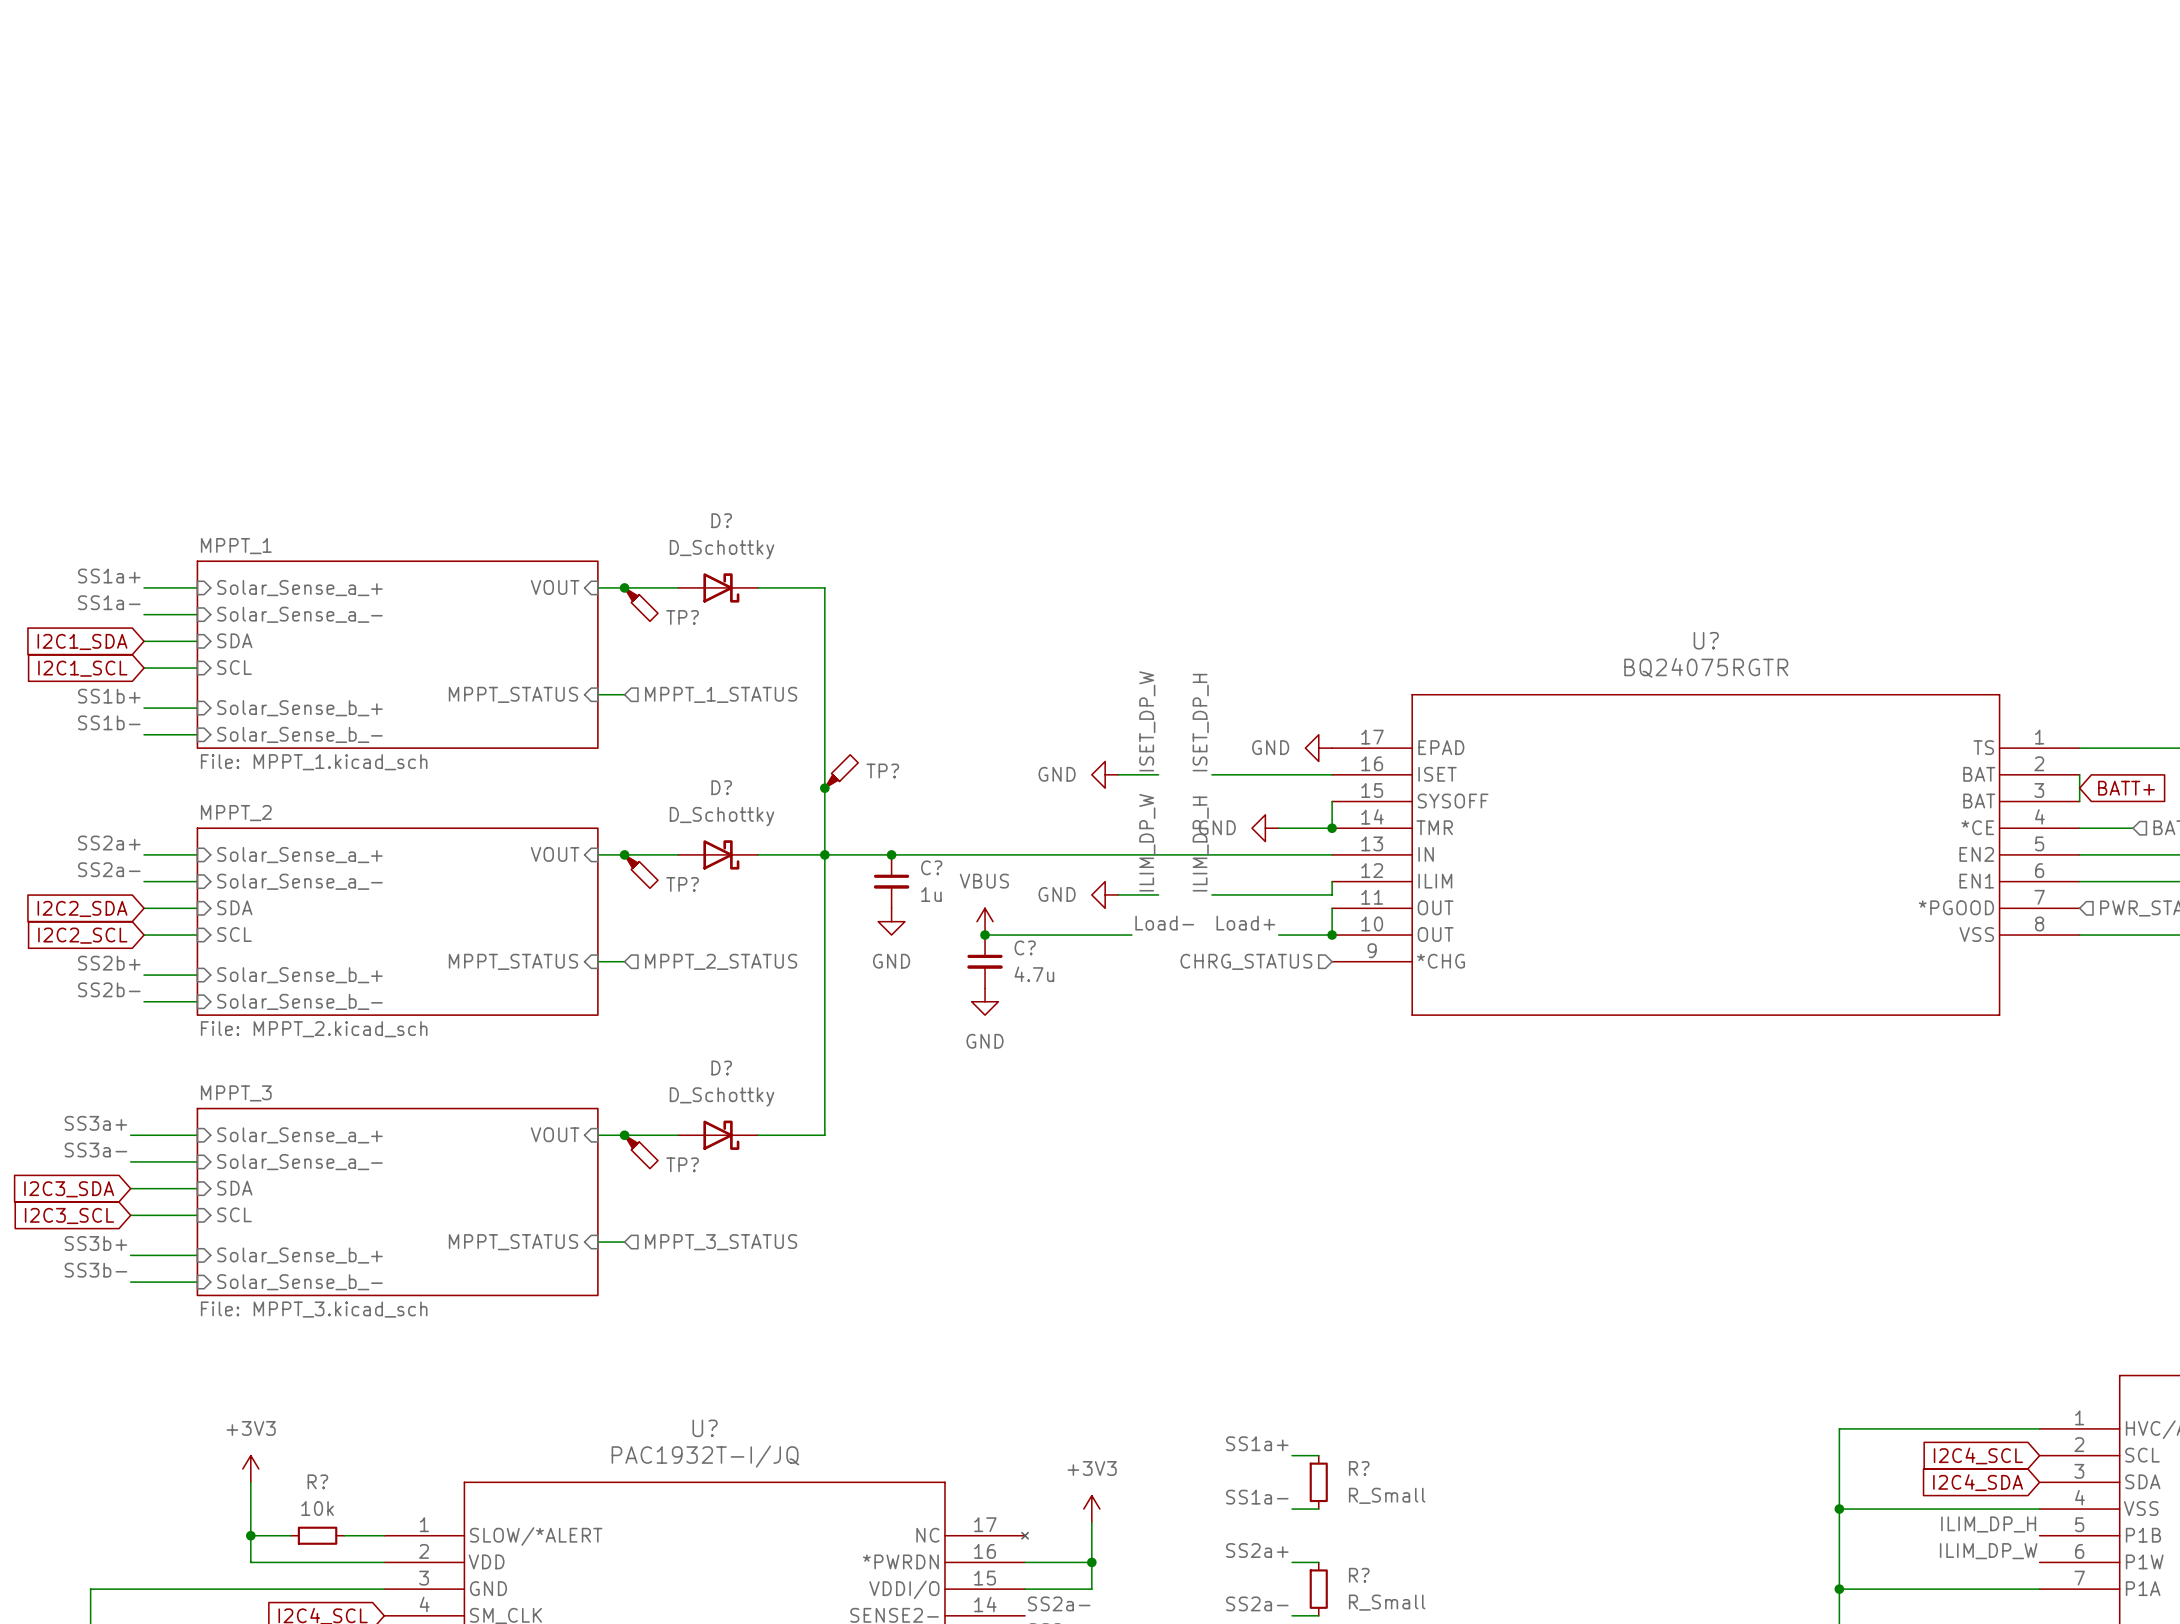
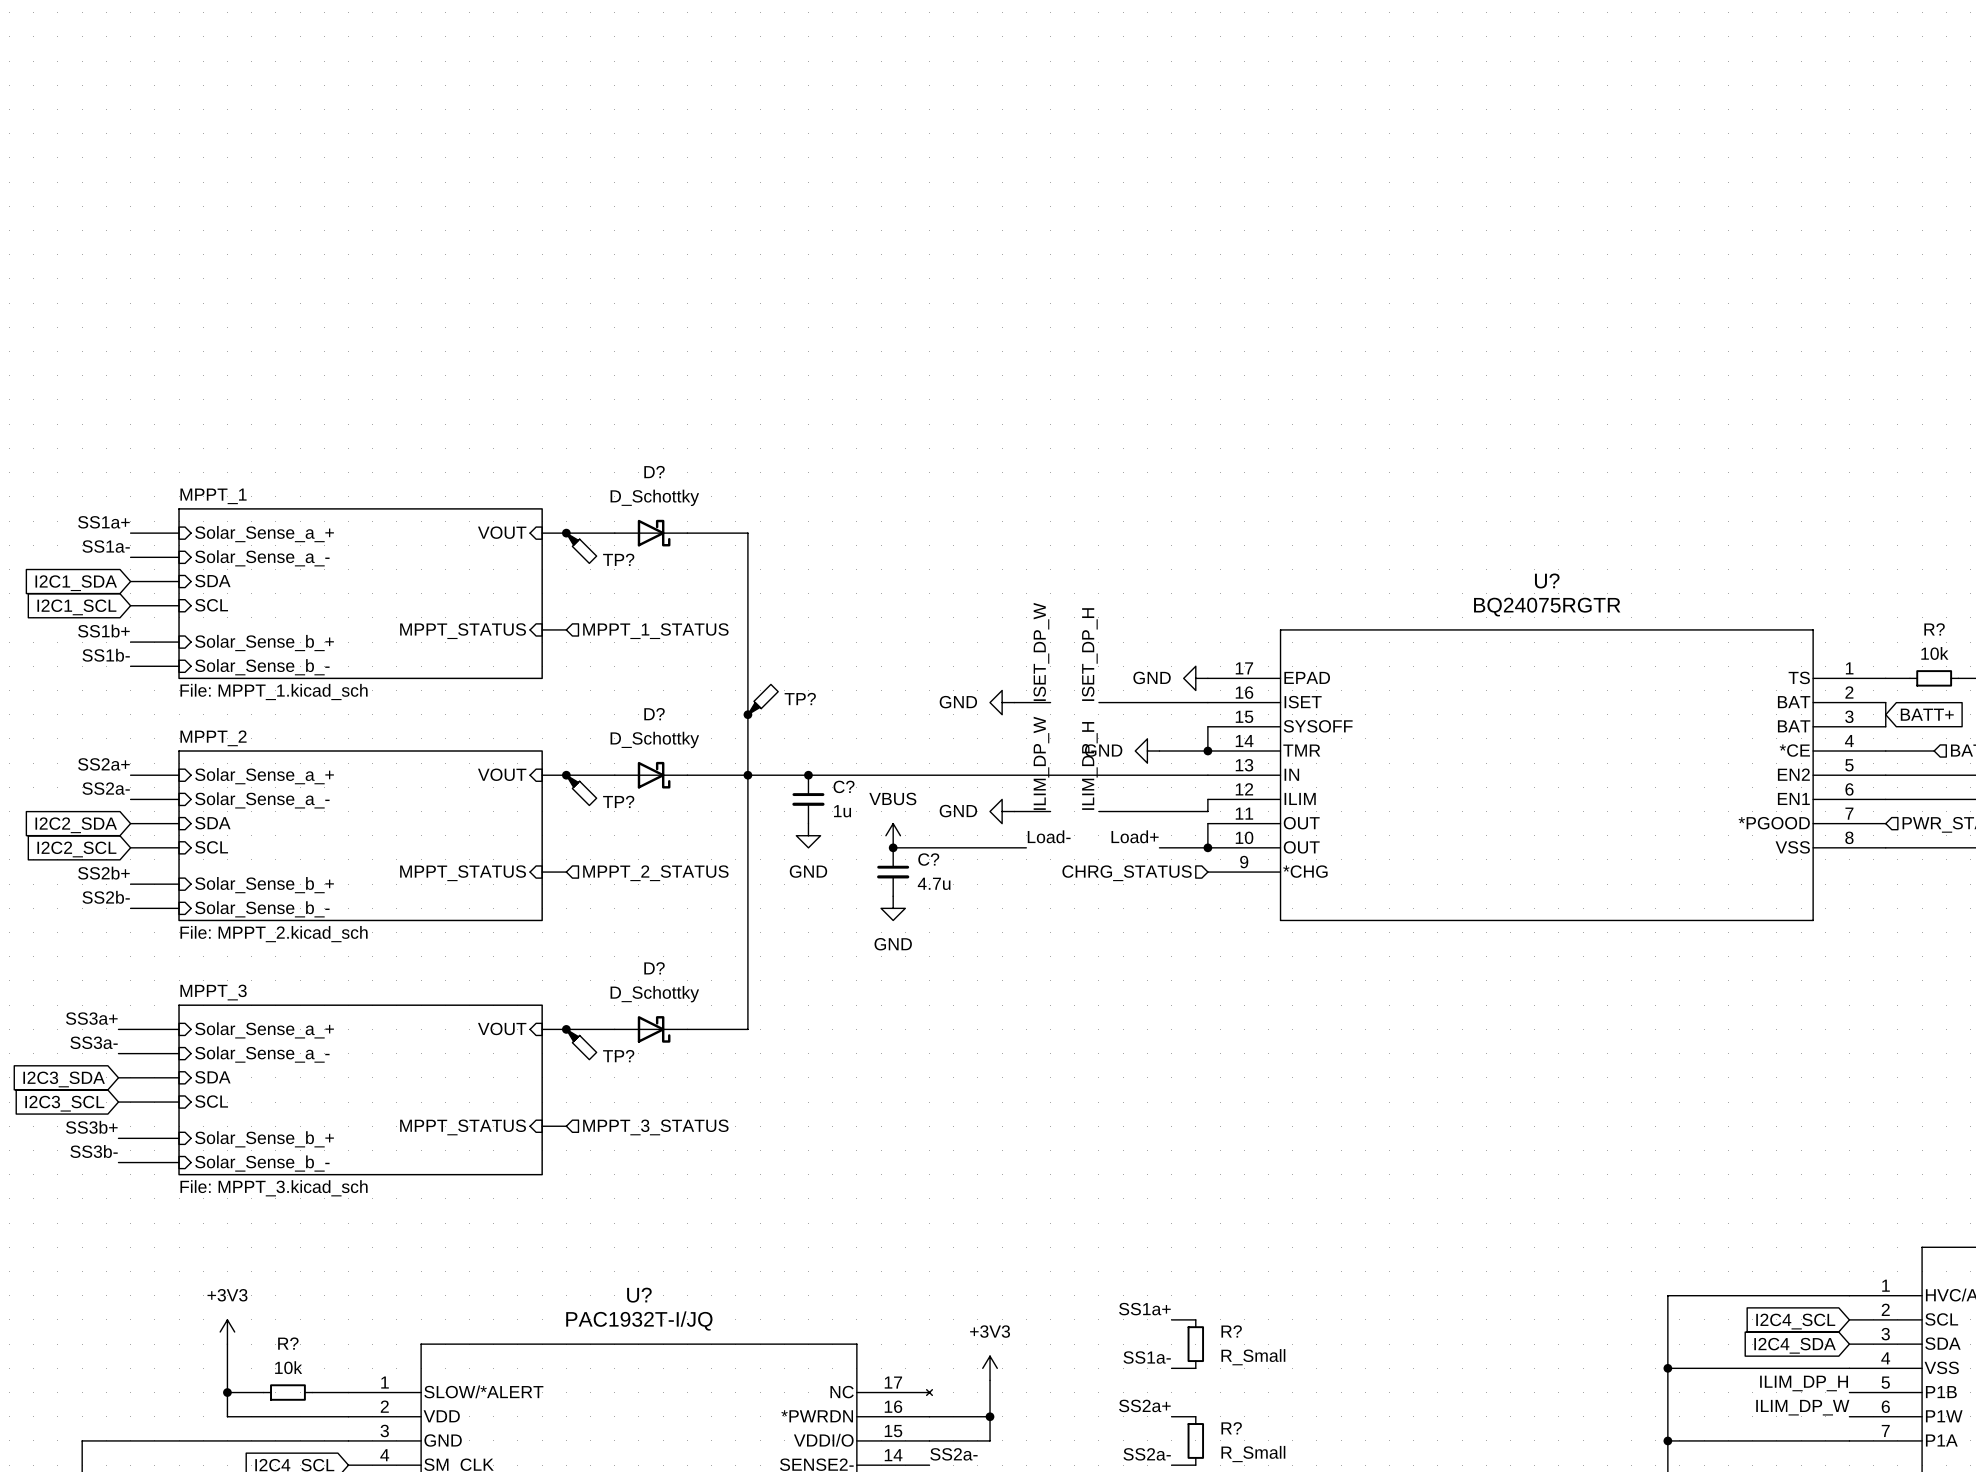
wire: (2106, 748) (2159, 748) -> none
R?: none -> 10k (1934, 678)

